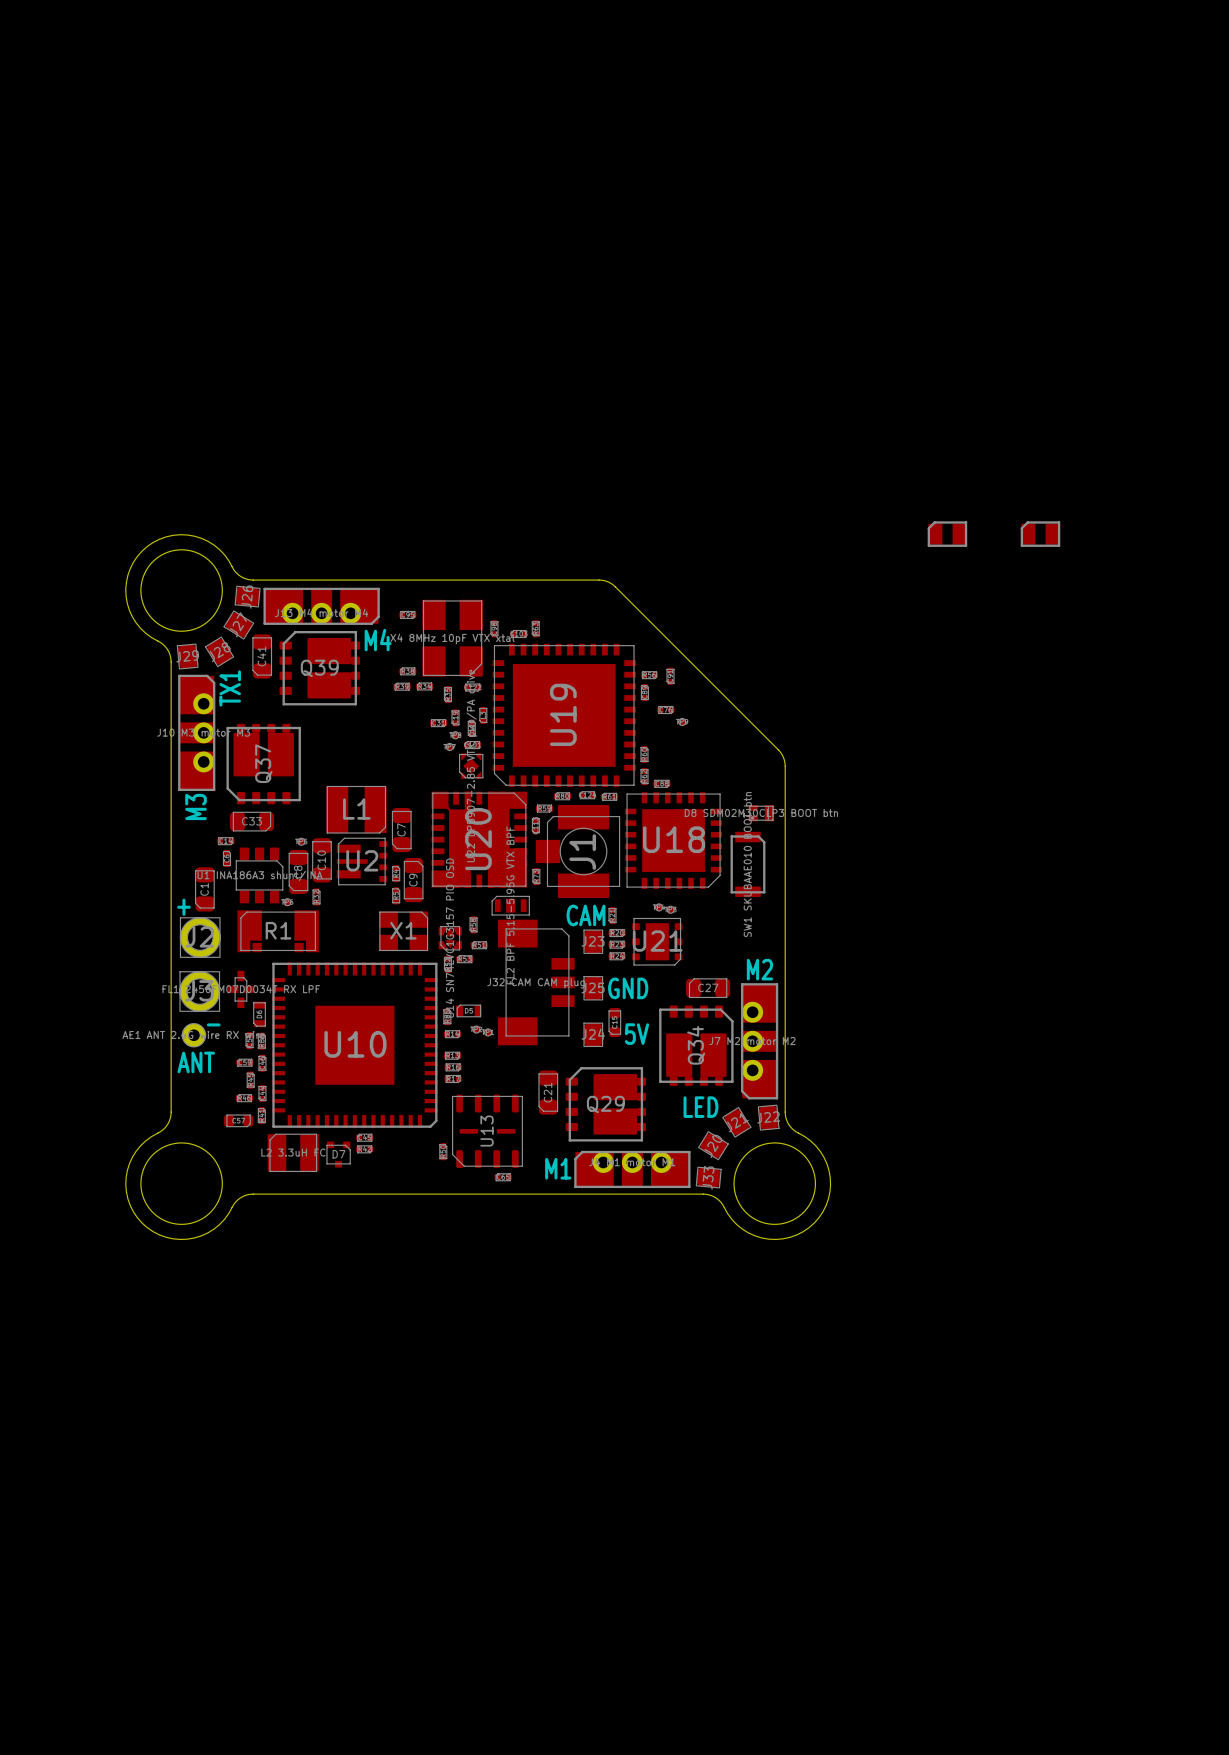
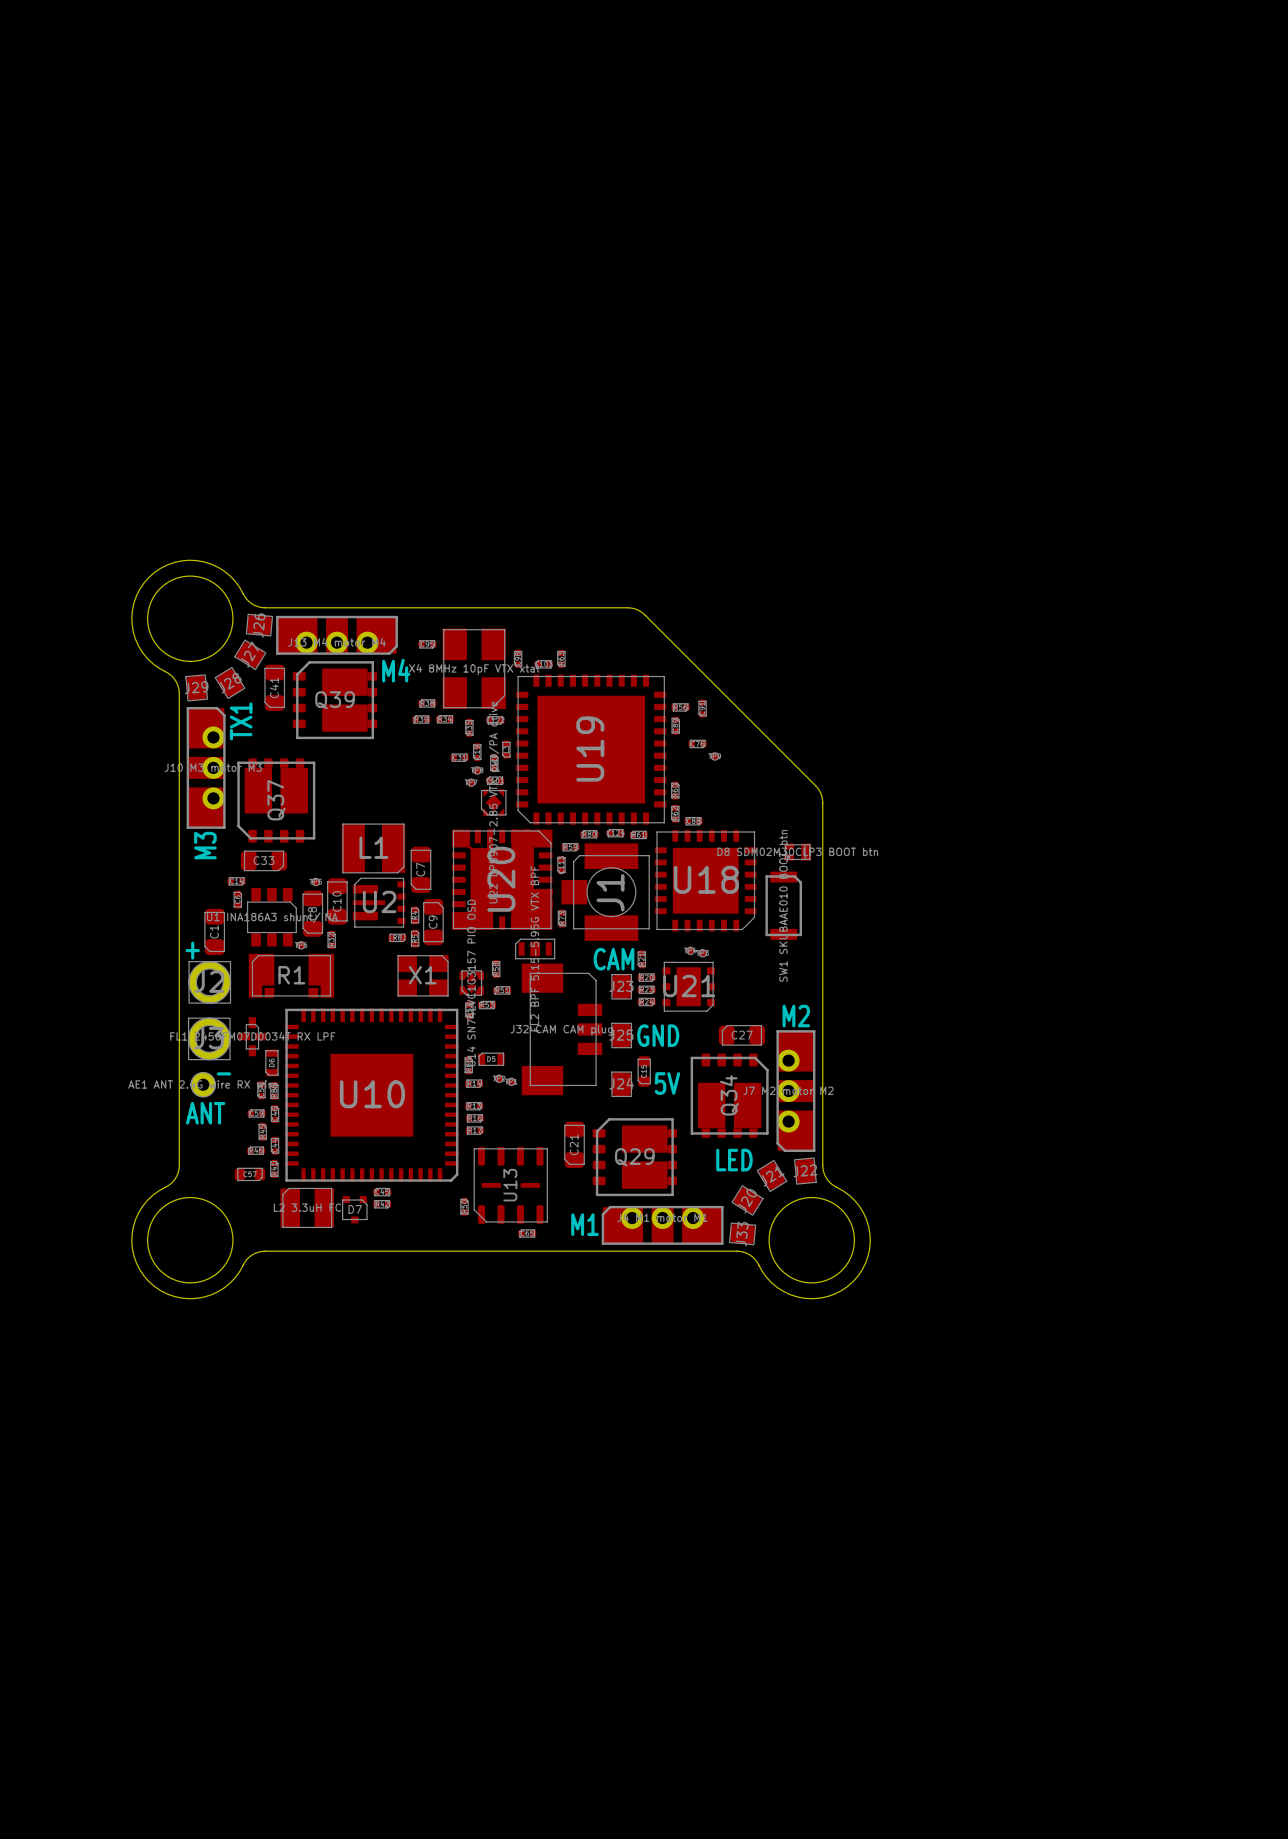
part: (947, 534) -> none
part: (1040, 534) -> none
part: none -> (397, 937)

